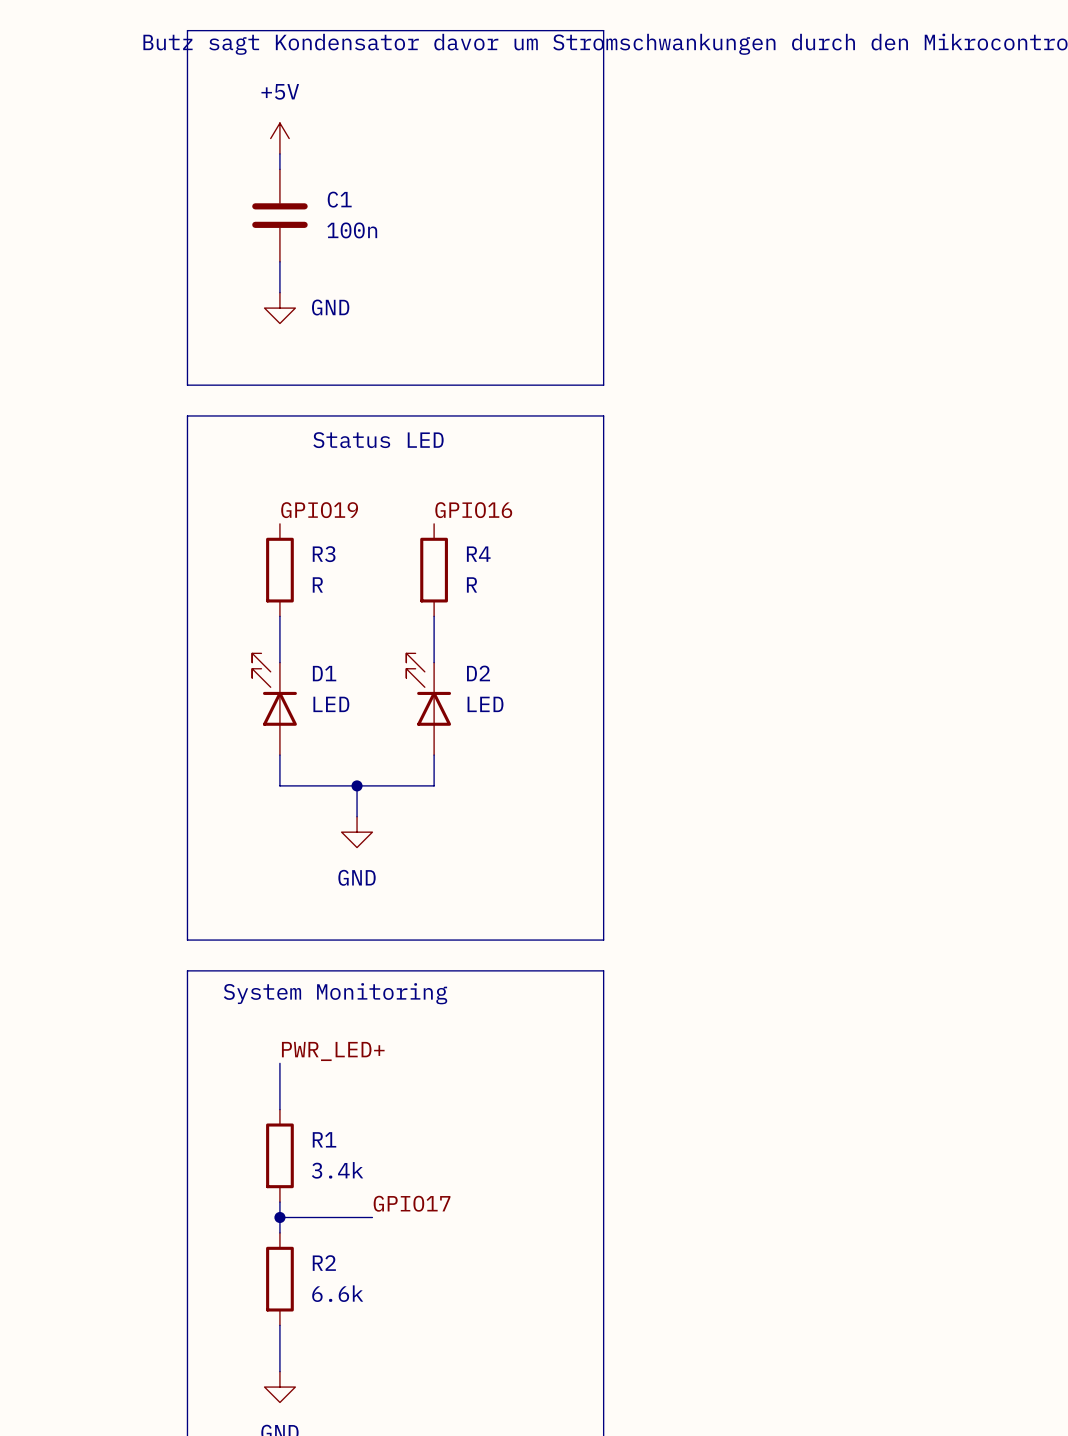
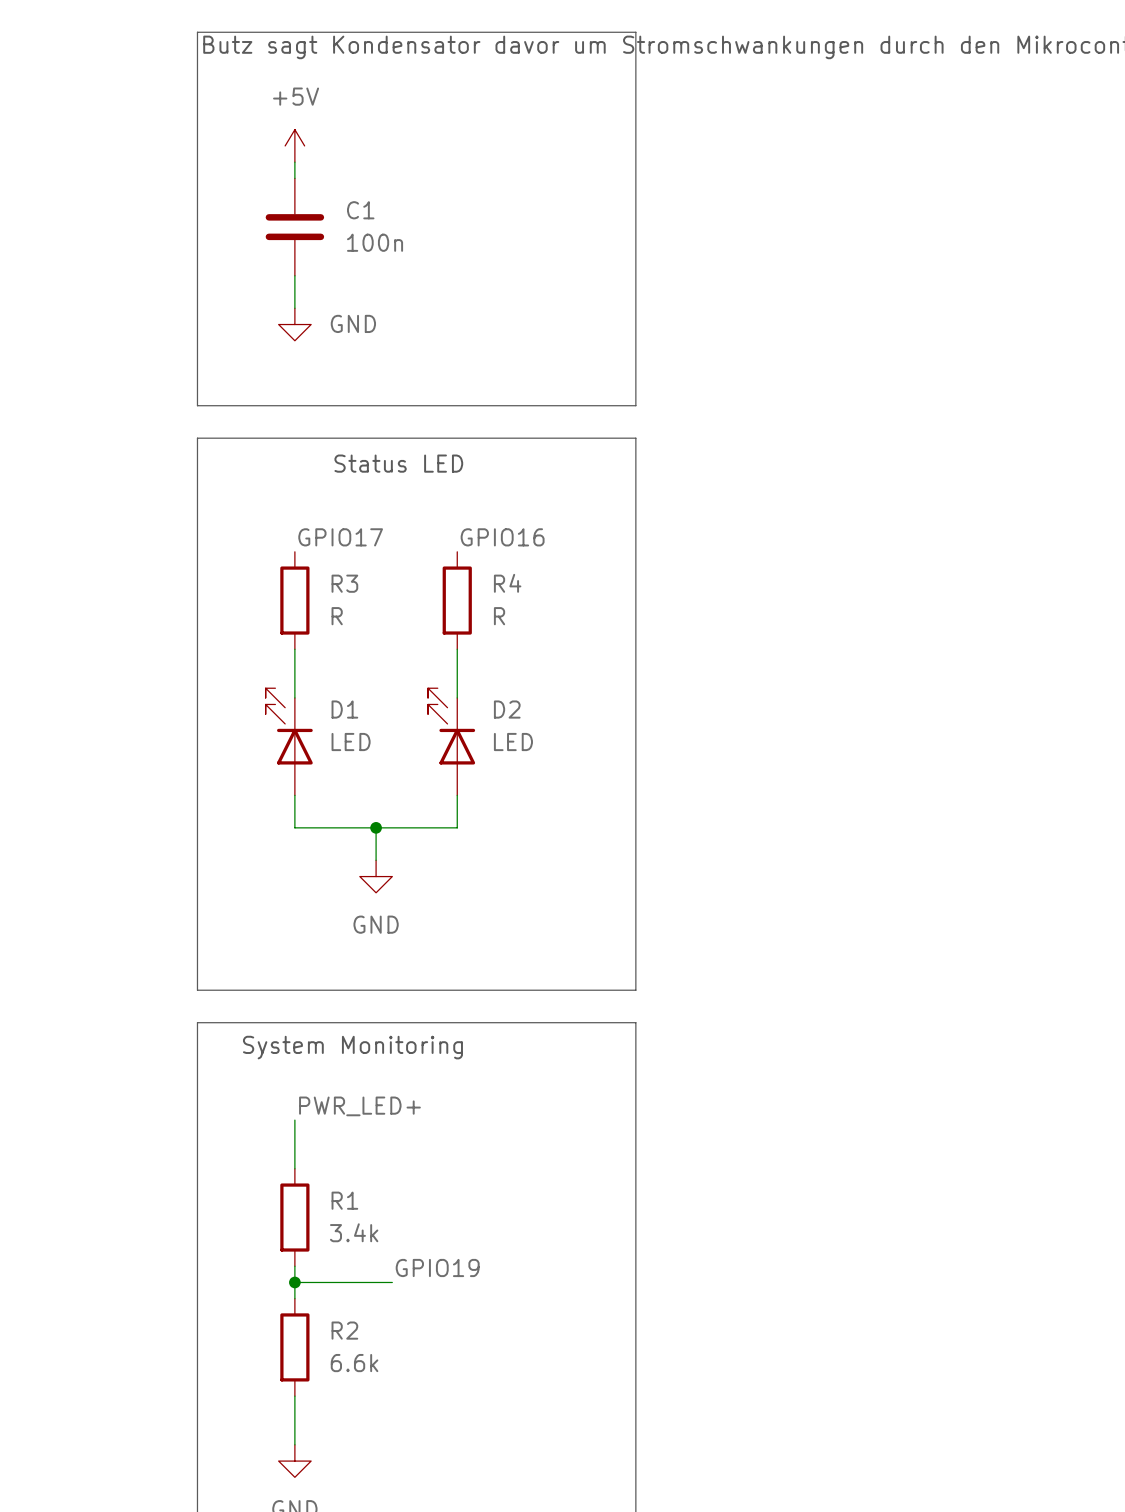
label: GPIO19 (319, 510) -> GPIO17 (340, 537)
label: GPIO17 (412, 1203) -> GPIO19 (437, 1267)

